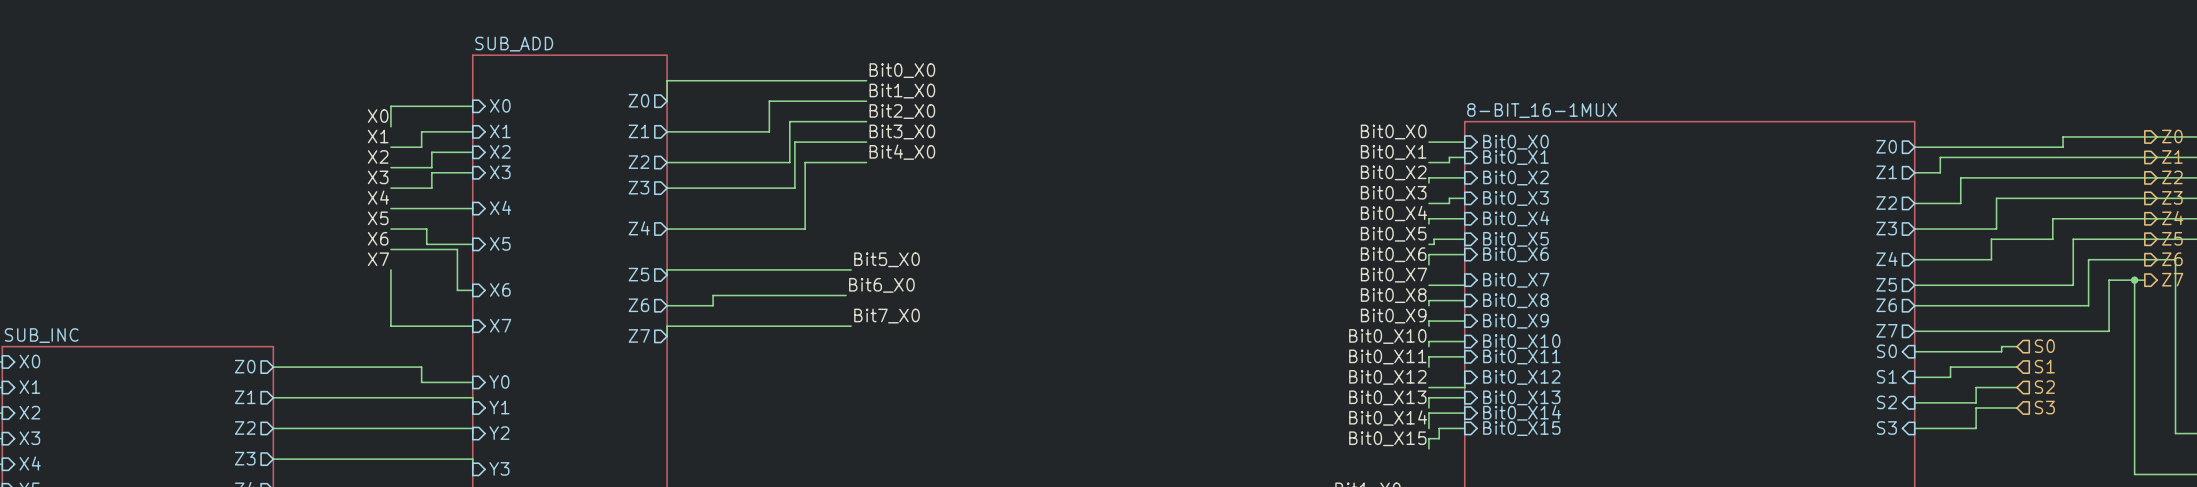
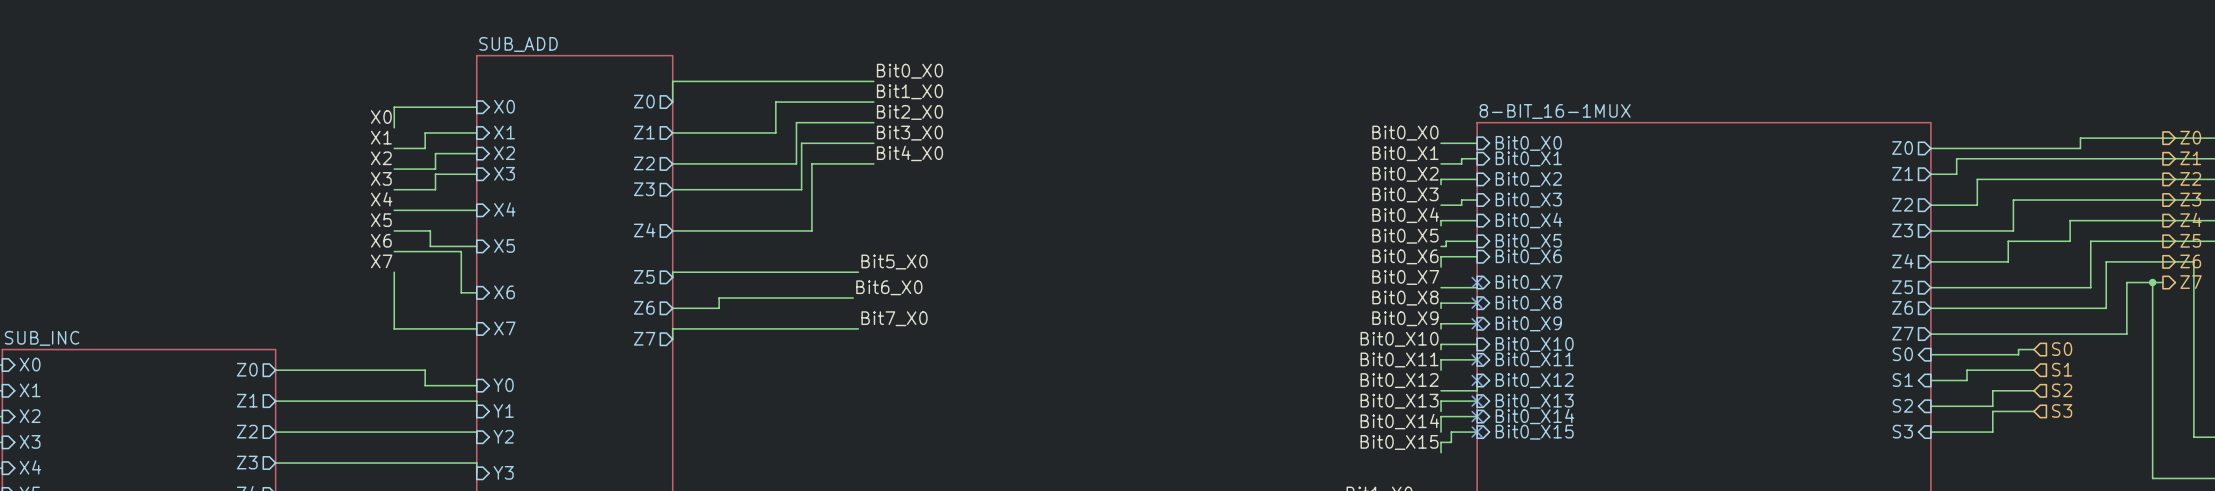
no-connect mark: none -> (1477, 282)
no-connect mark: none -> (1477, 303)
no-connect mark: none -> (1477, 323)
no-connect mark: none -> (1477, 359)
no-connect mark: none -> (1477, 380)
no-connect mark: none -> (1477, 401)
no-connect mark: none -> (1477, 416)
no-connect mark: none -> (1477, 432)

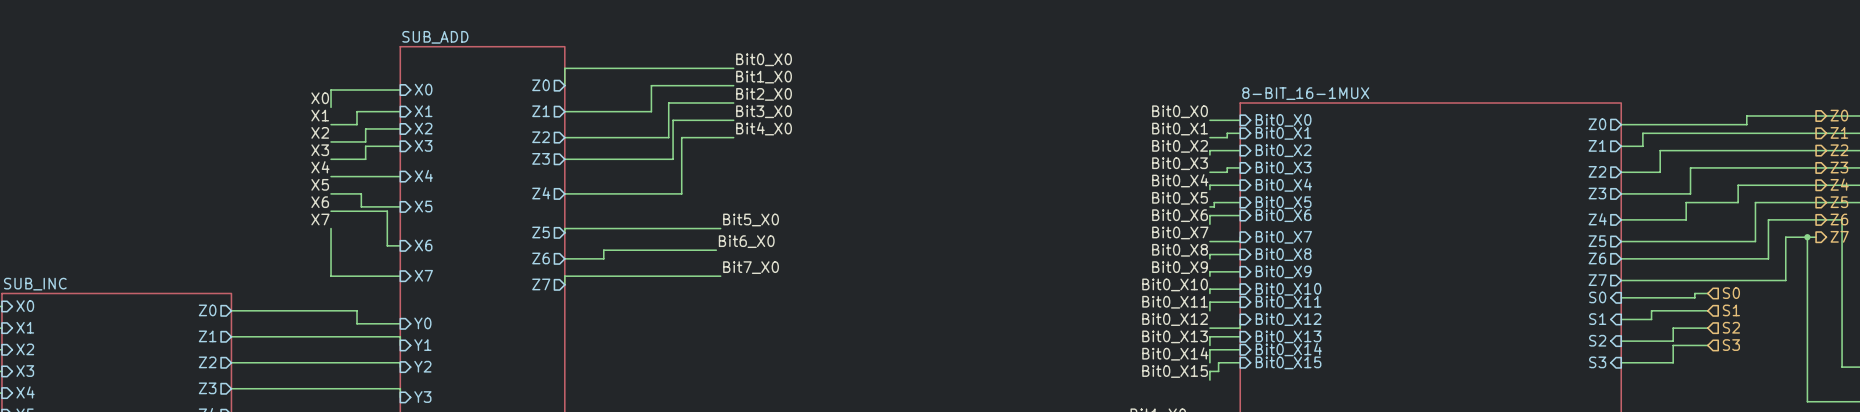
no-connect mark: (1477, 282) -> none
no-connect mark: (1477, 303) -> none
no-connect mark: (1477, 323) -> none
no-connect mark: (1477, 359) -> none
no-connect mark: (1477, 380) -> none
no-connect mark: (1477, 401) -> none
no-connect mark: (1477, 416) -> none
no-connect mark: (1477, 432) -> none

